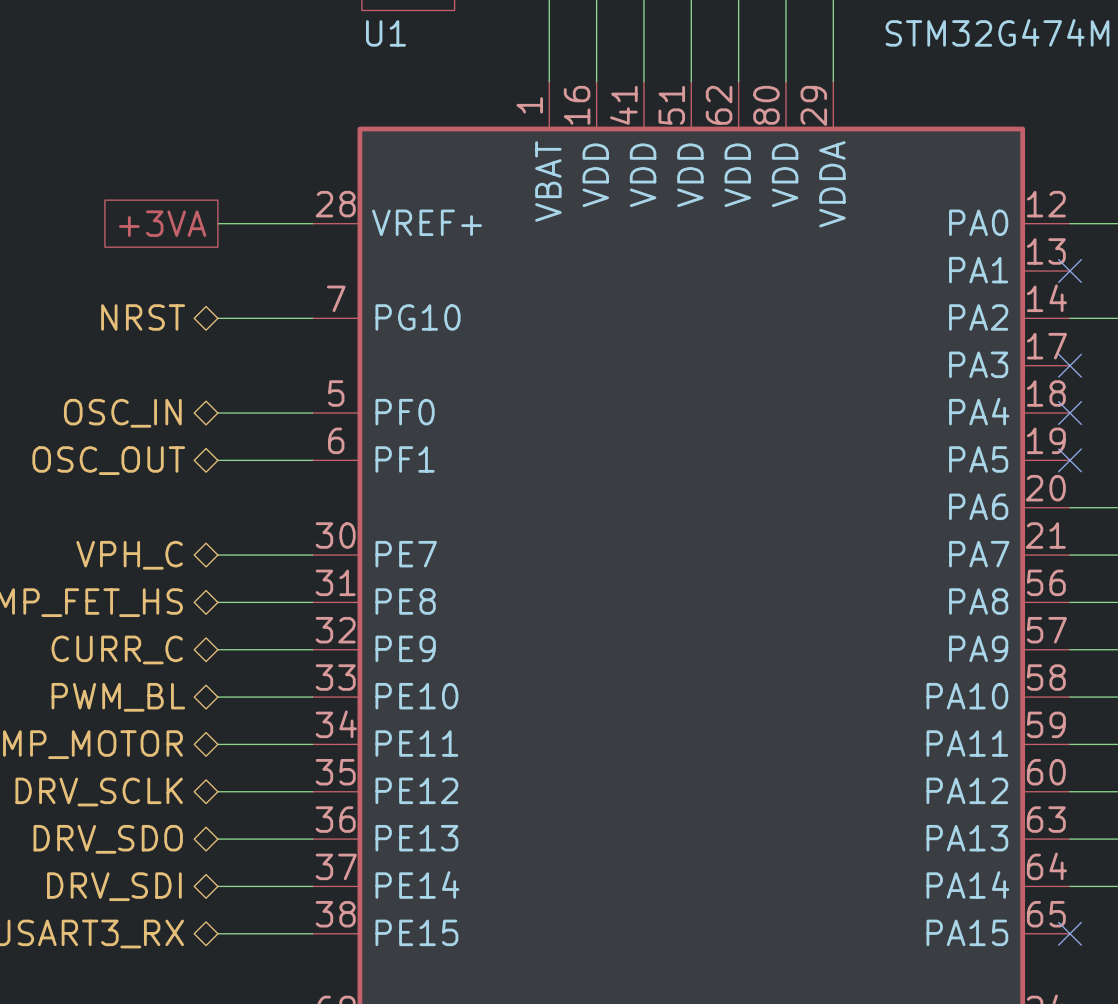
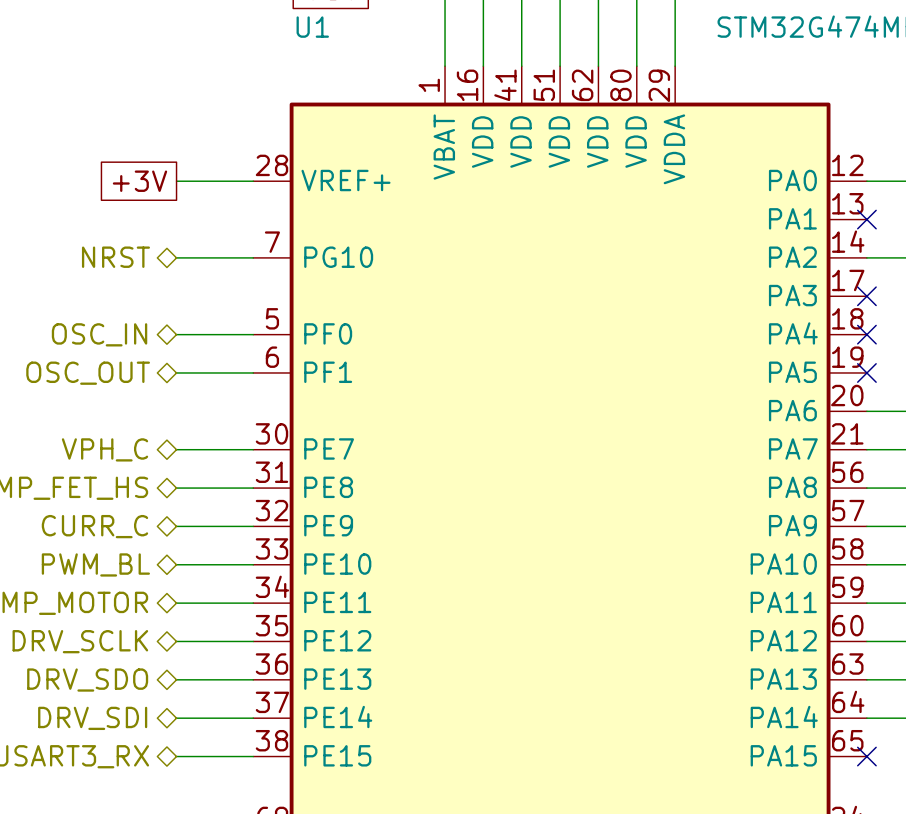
global label: +3VA (162, 223) -> +3V (139, 181)

